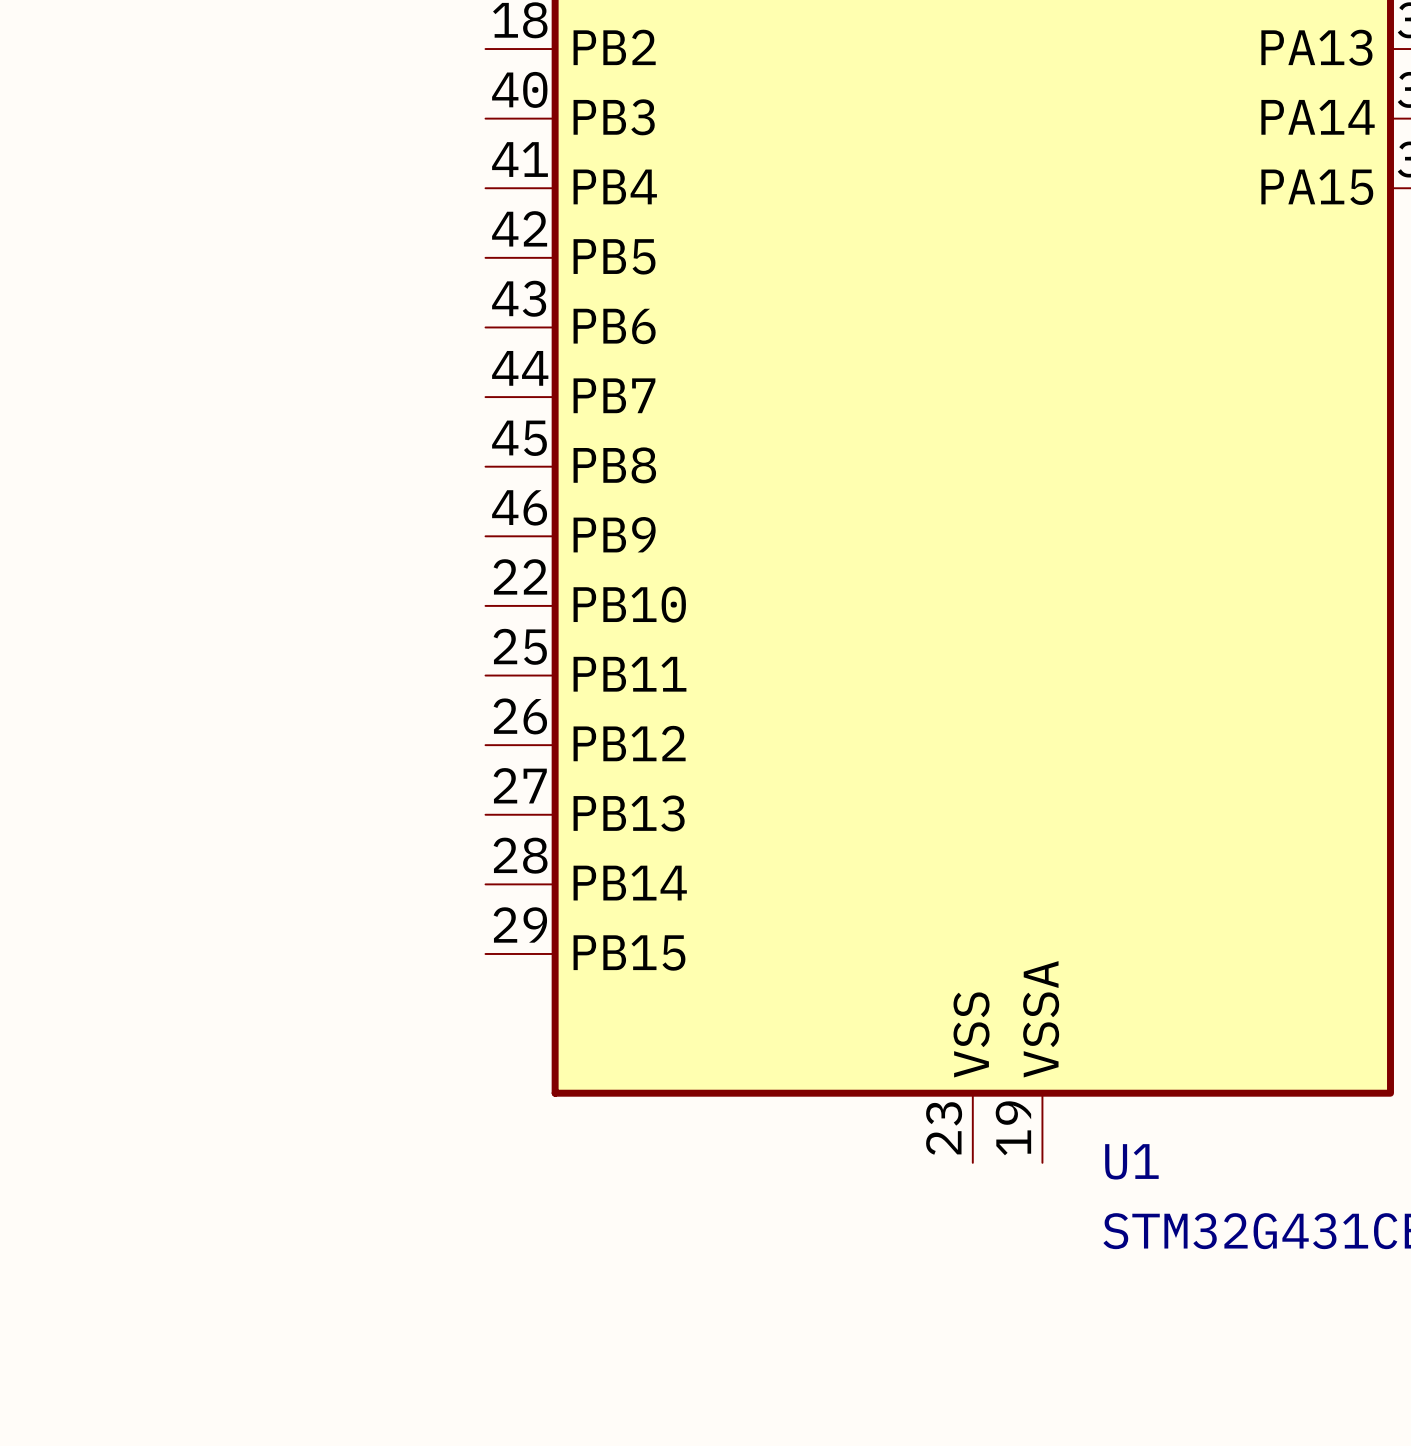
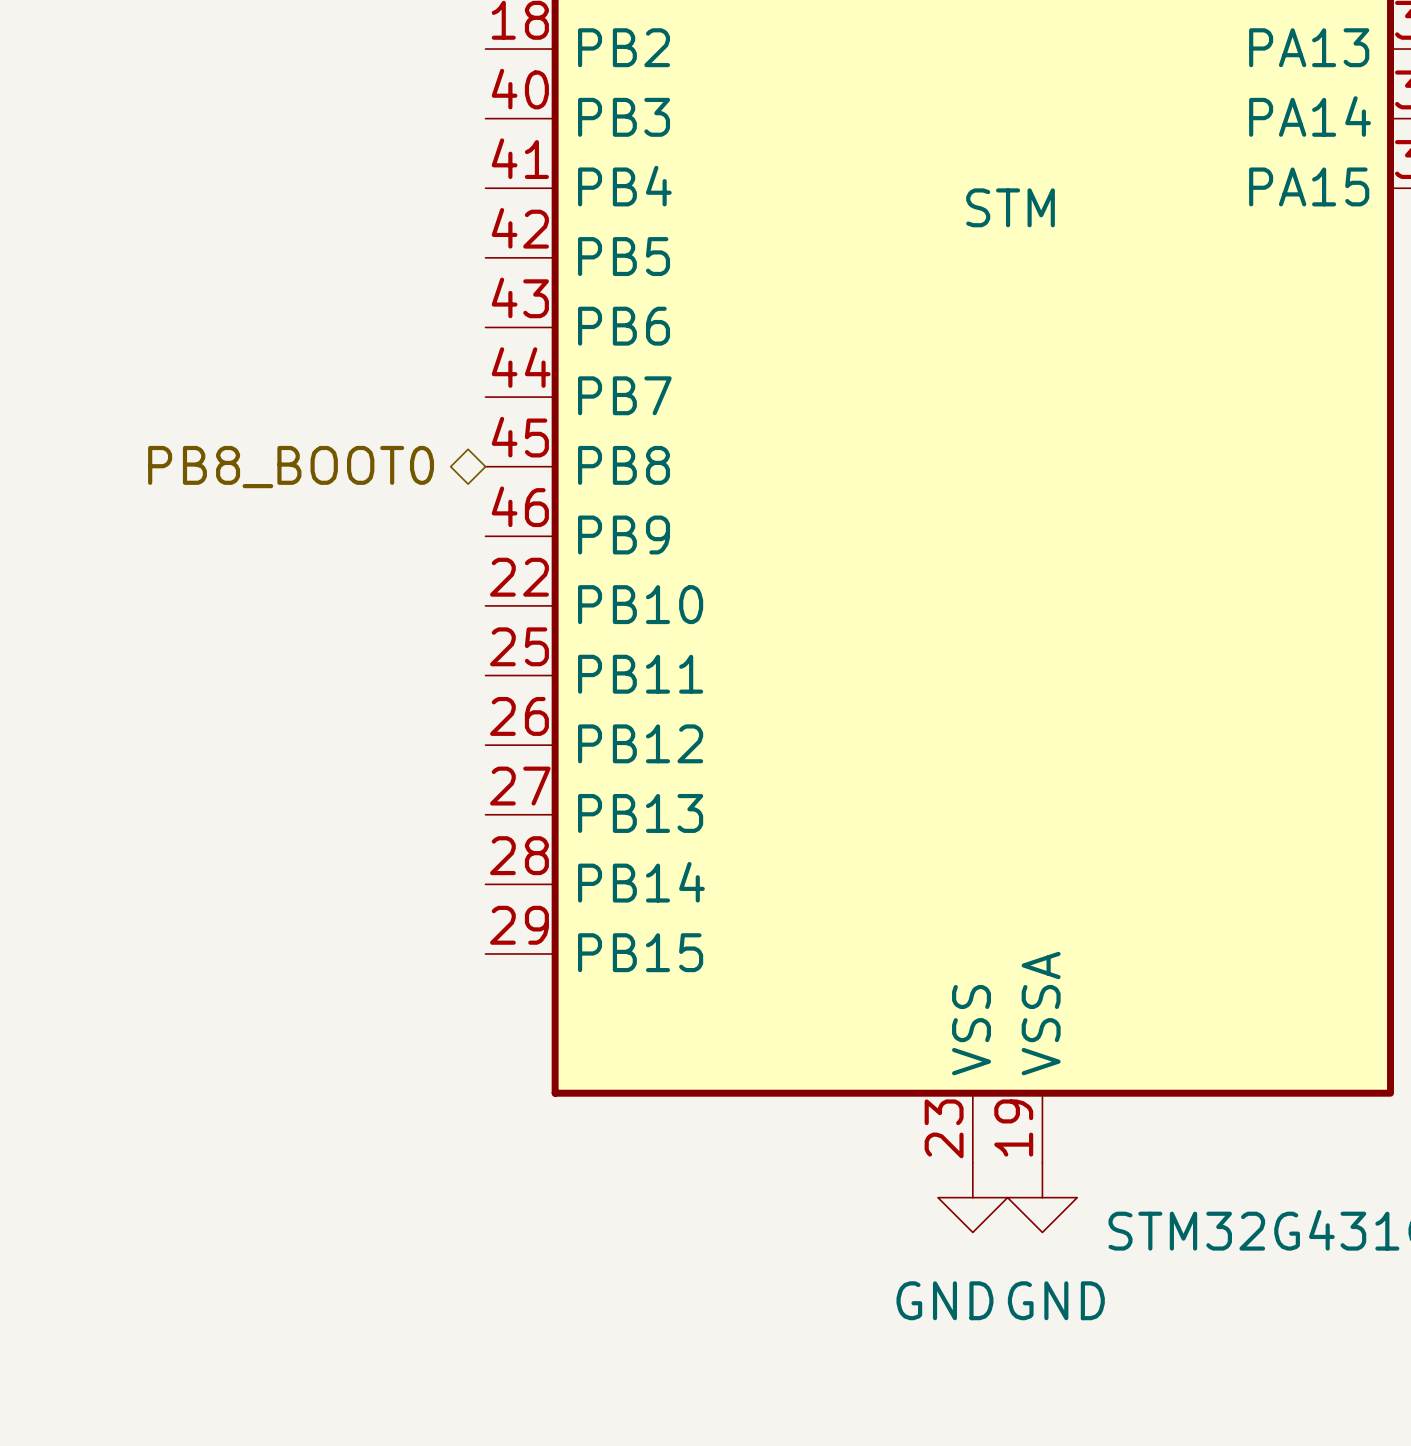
hierarchical label: none -> PB8_BOOT0 (291, 467)
U1 name: U1 (1131, 1161) -> STM (1010, 207)
power symbol: none -> GND (972, 1197)
power symbol: none -> GND (1042, 1197)

